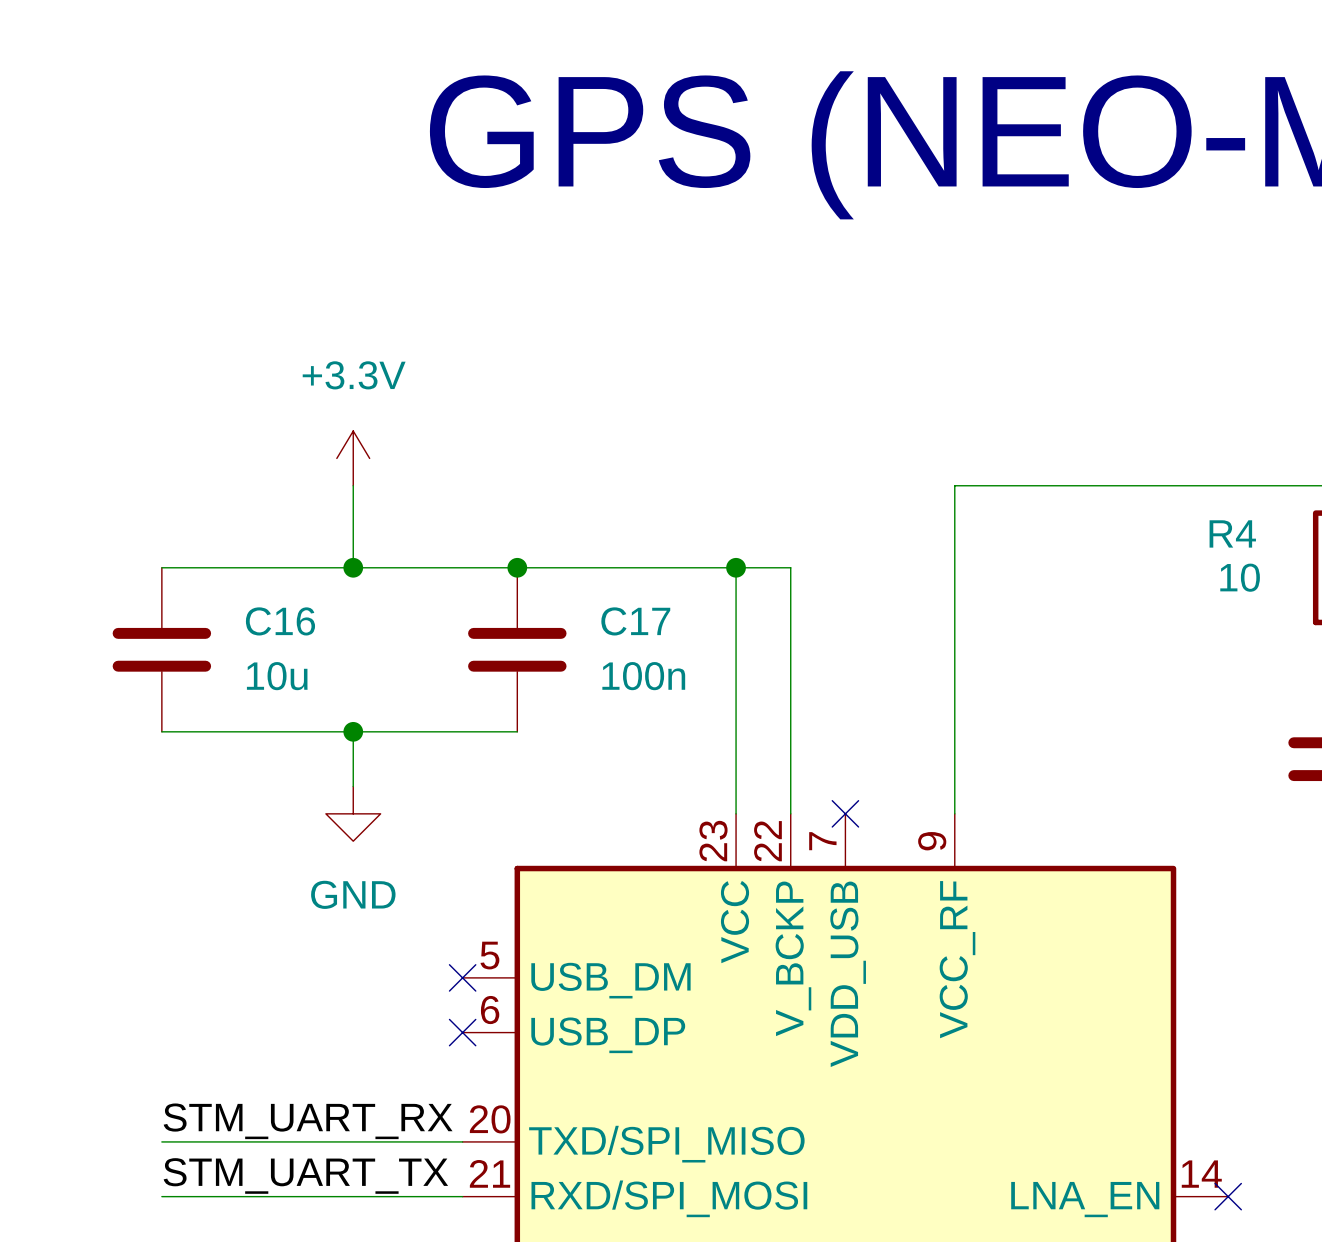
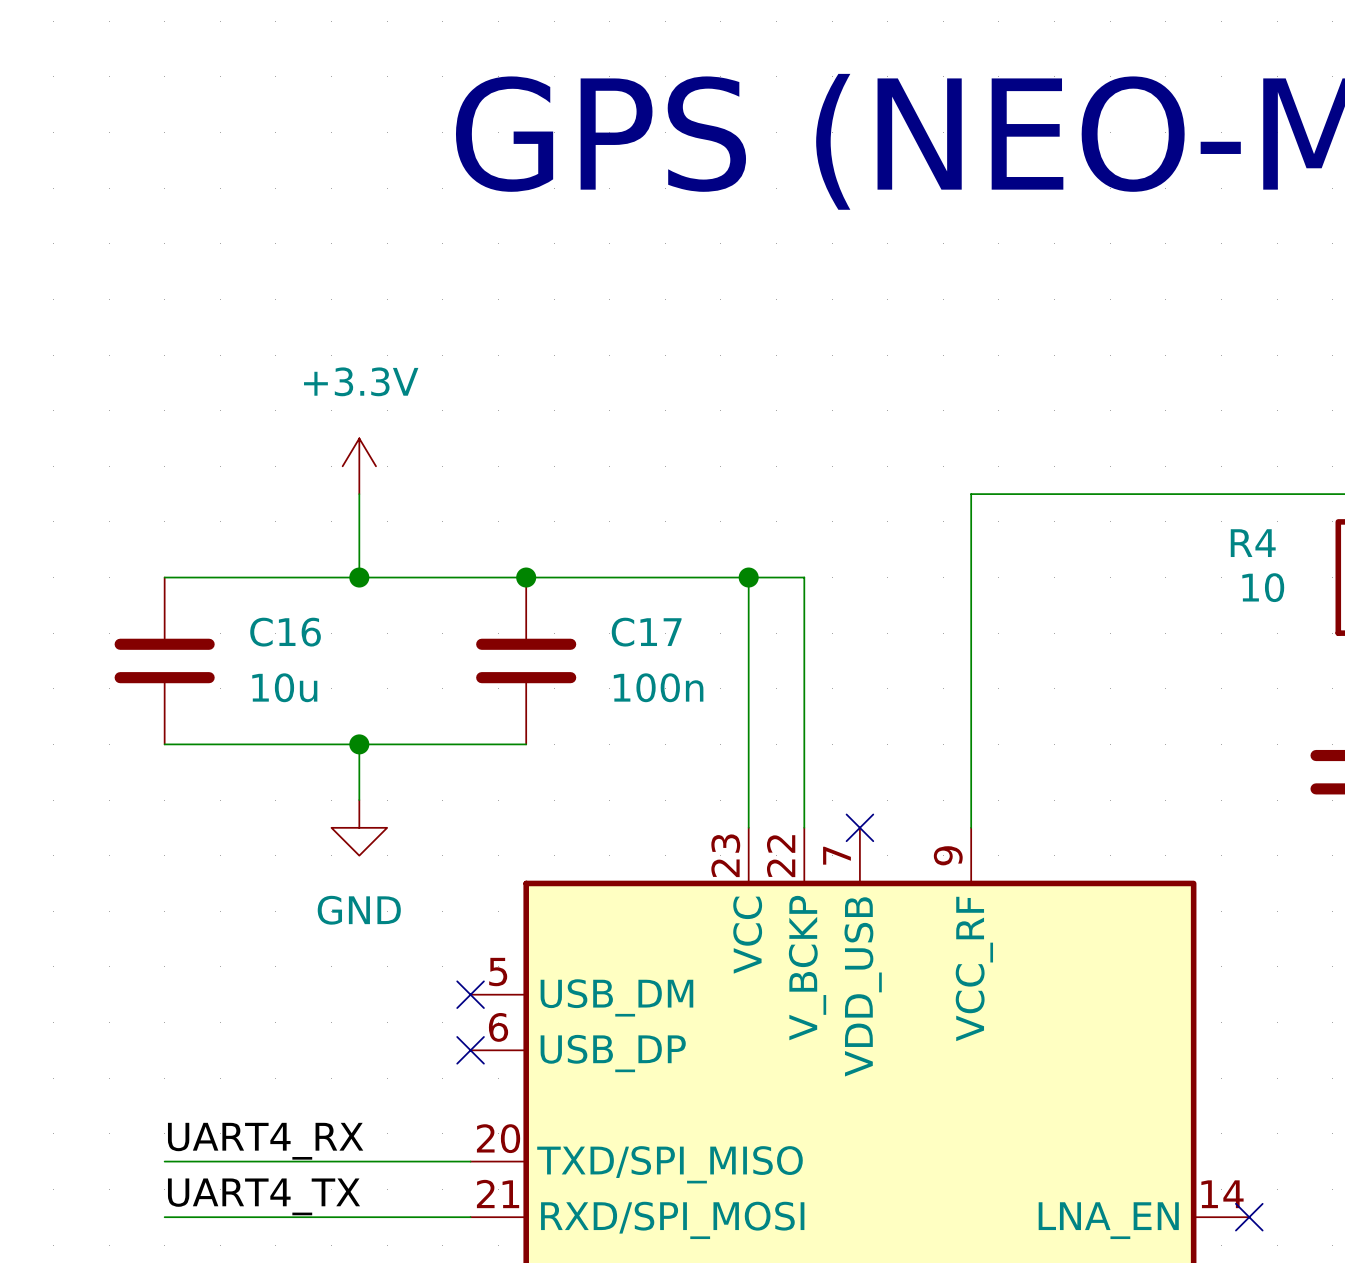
label: STM_UART_RX (308, 1121) -> UART4_RX (265, 1141)
label: STM_UART_TX (305, 1175) -> UART4_TX (264, 1196)

